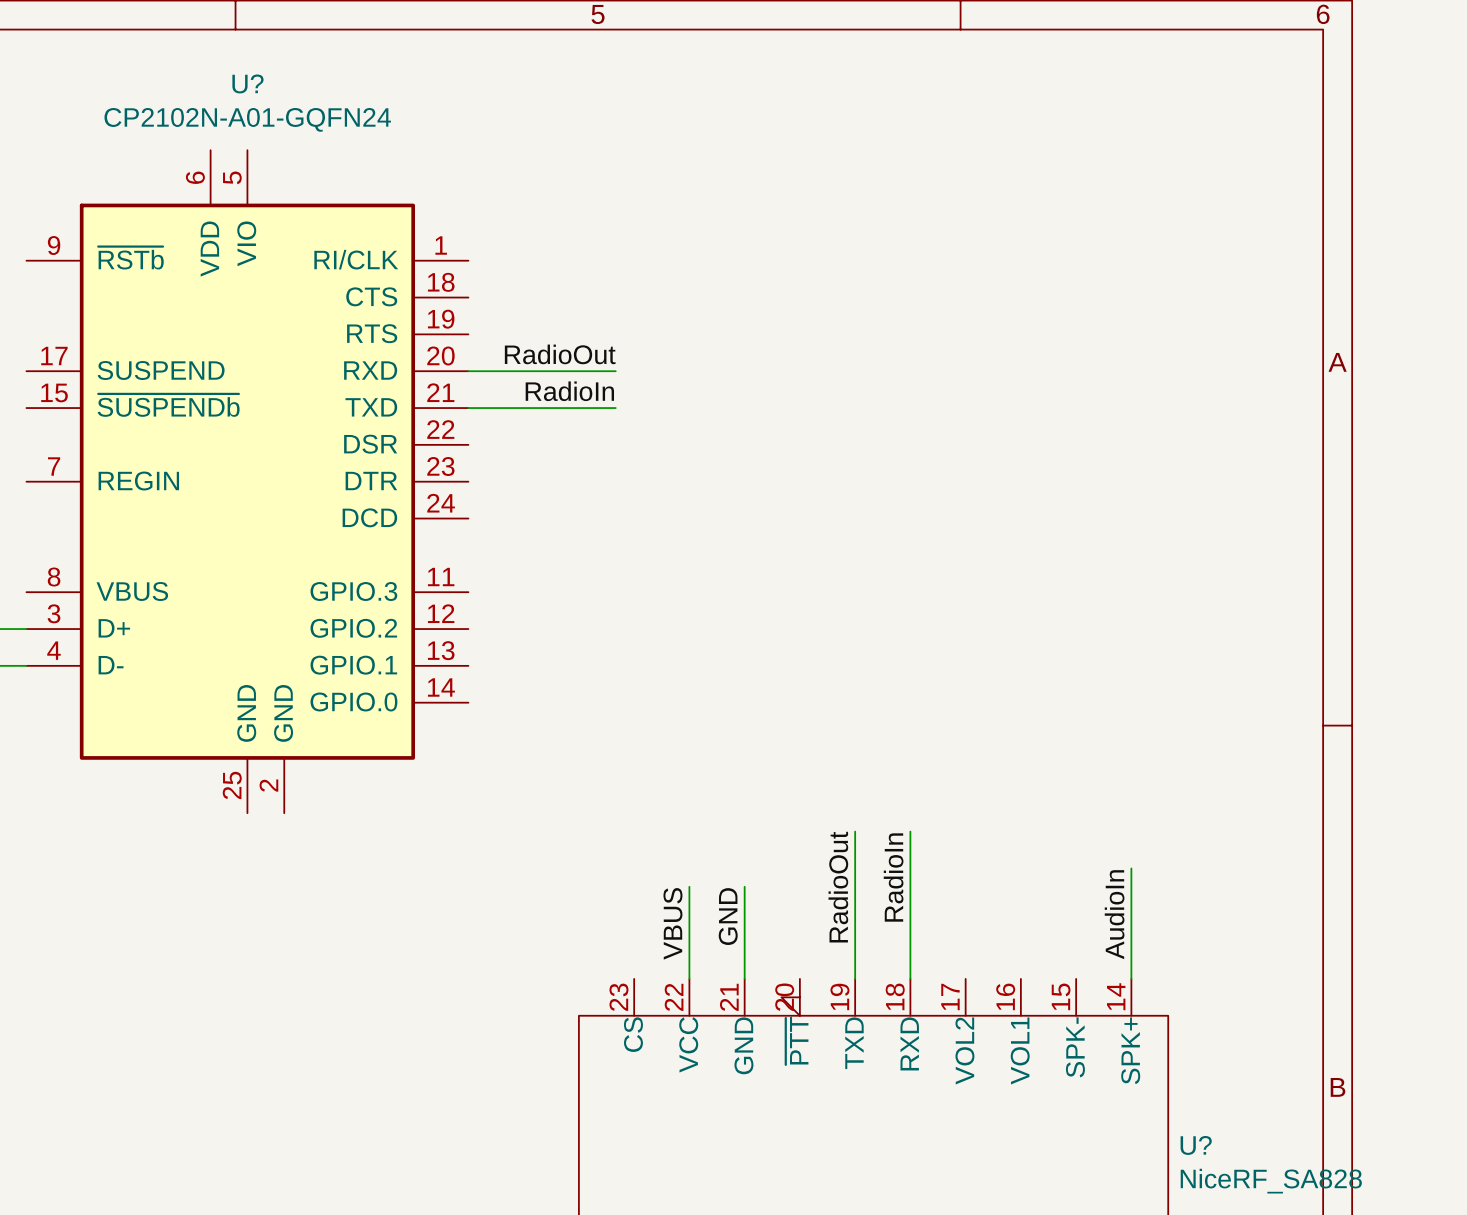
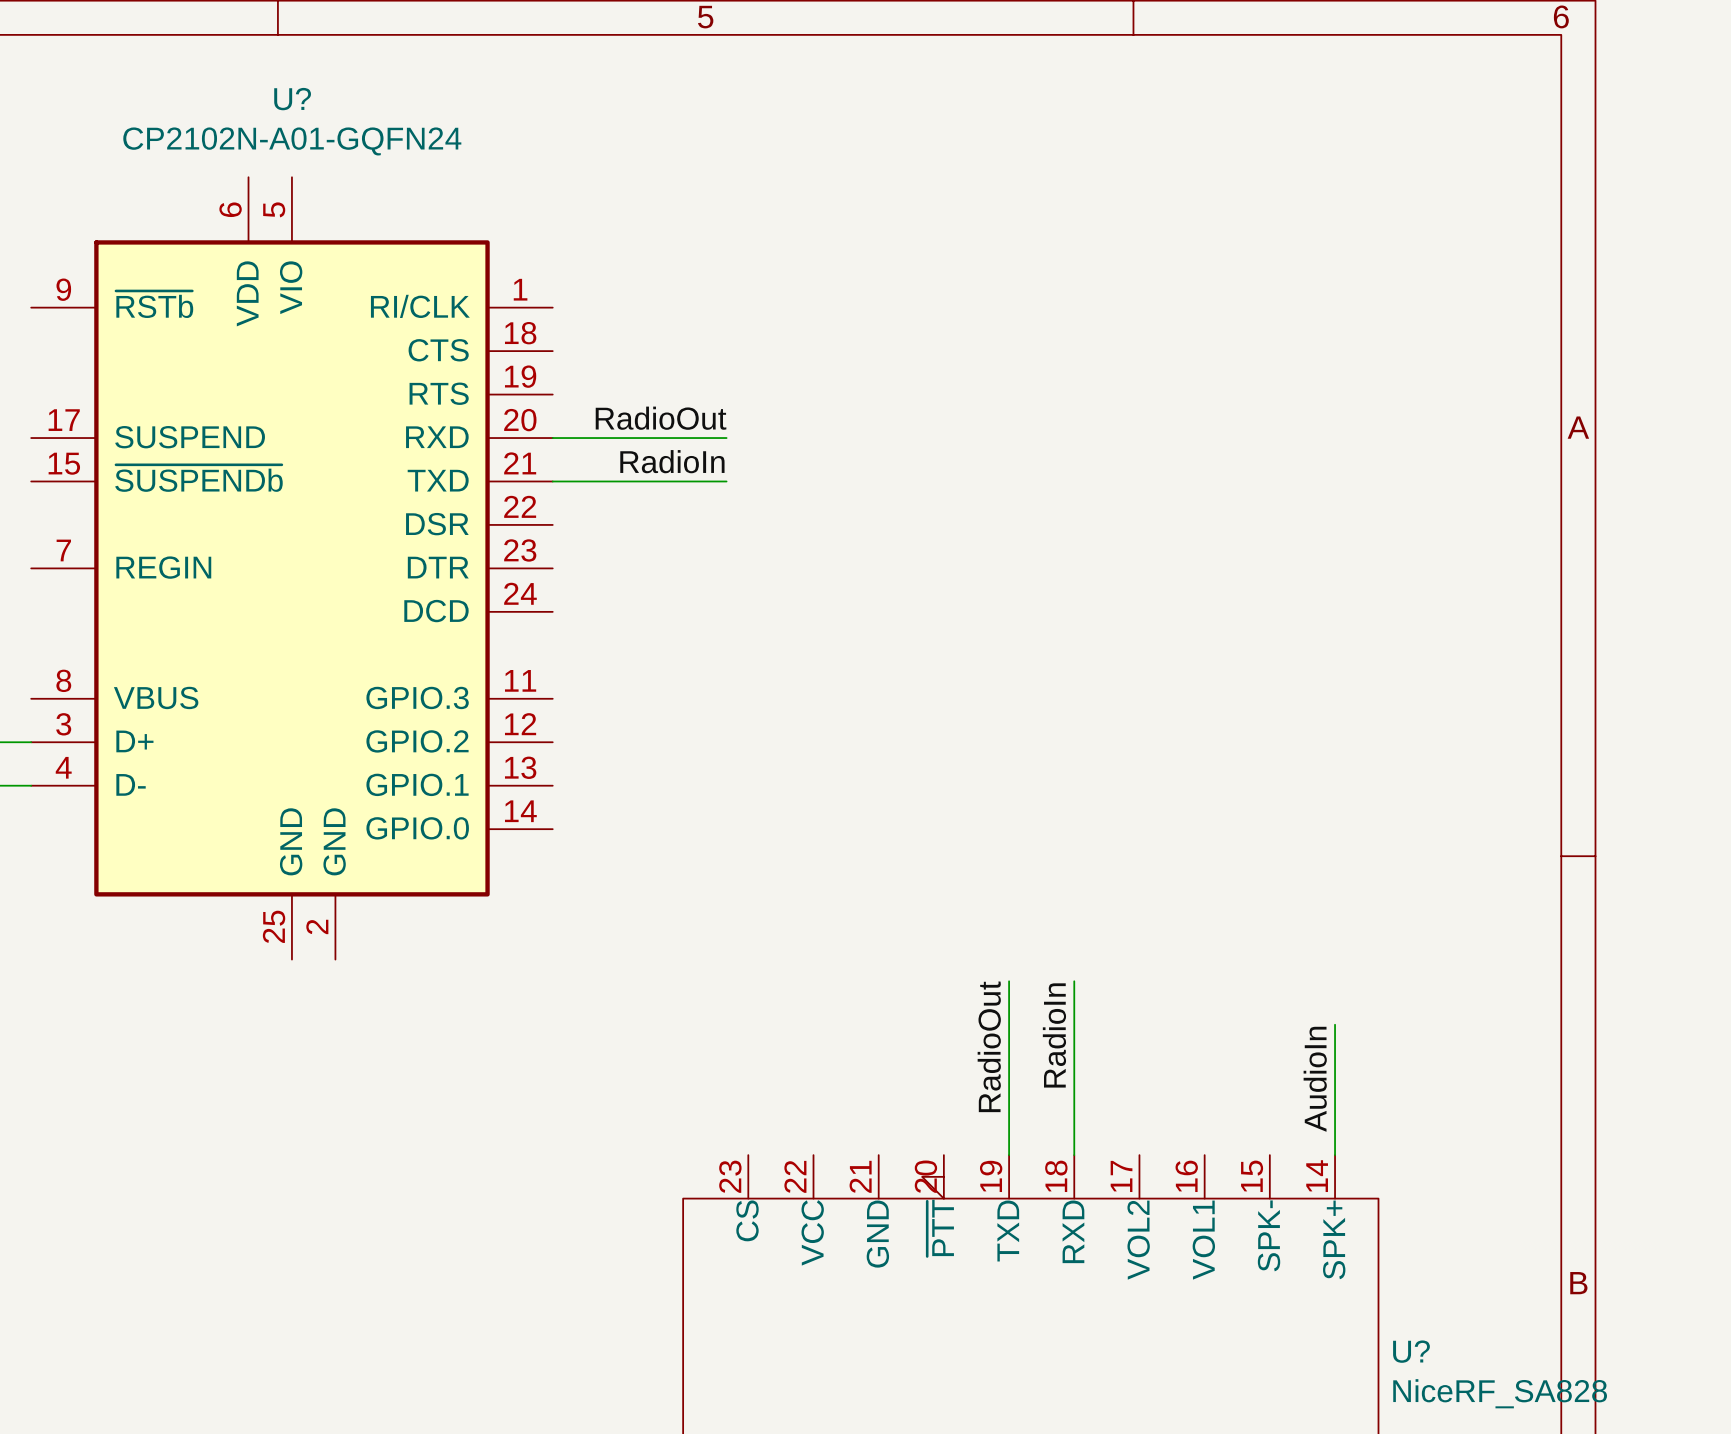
wire: (689, 886) (689, 978) -> none
wire: (744, 886) (744, 978) -> none
label: GND (728, 916) -> none
label: VBUS (672, 923) -> none

